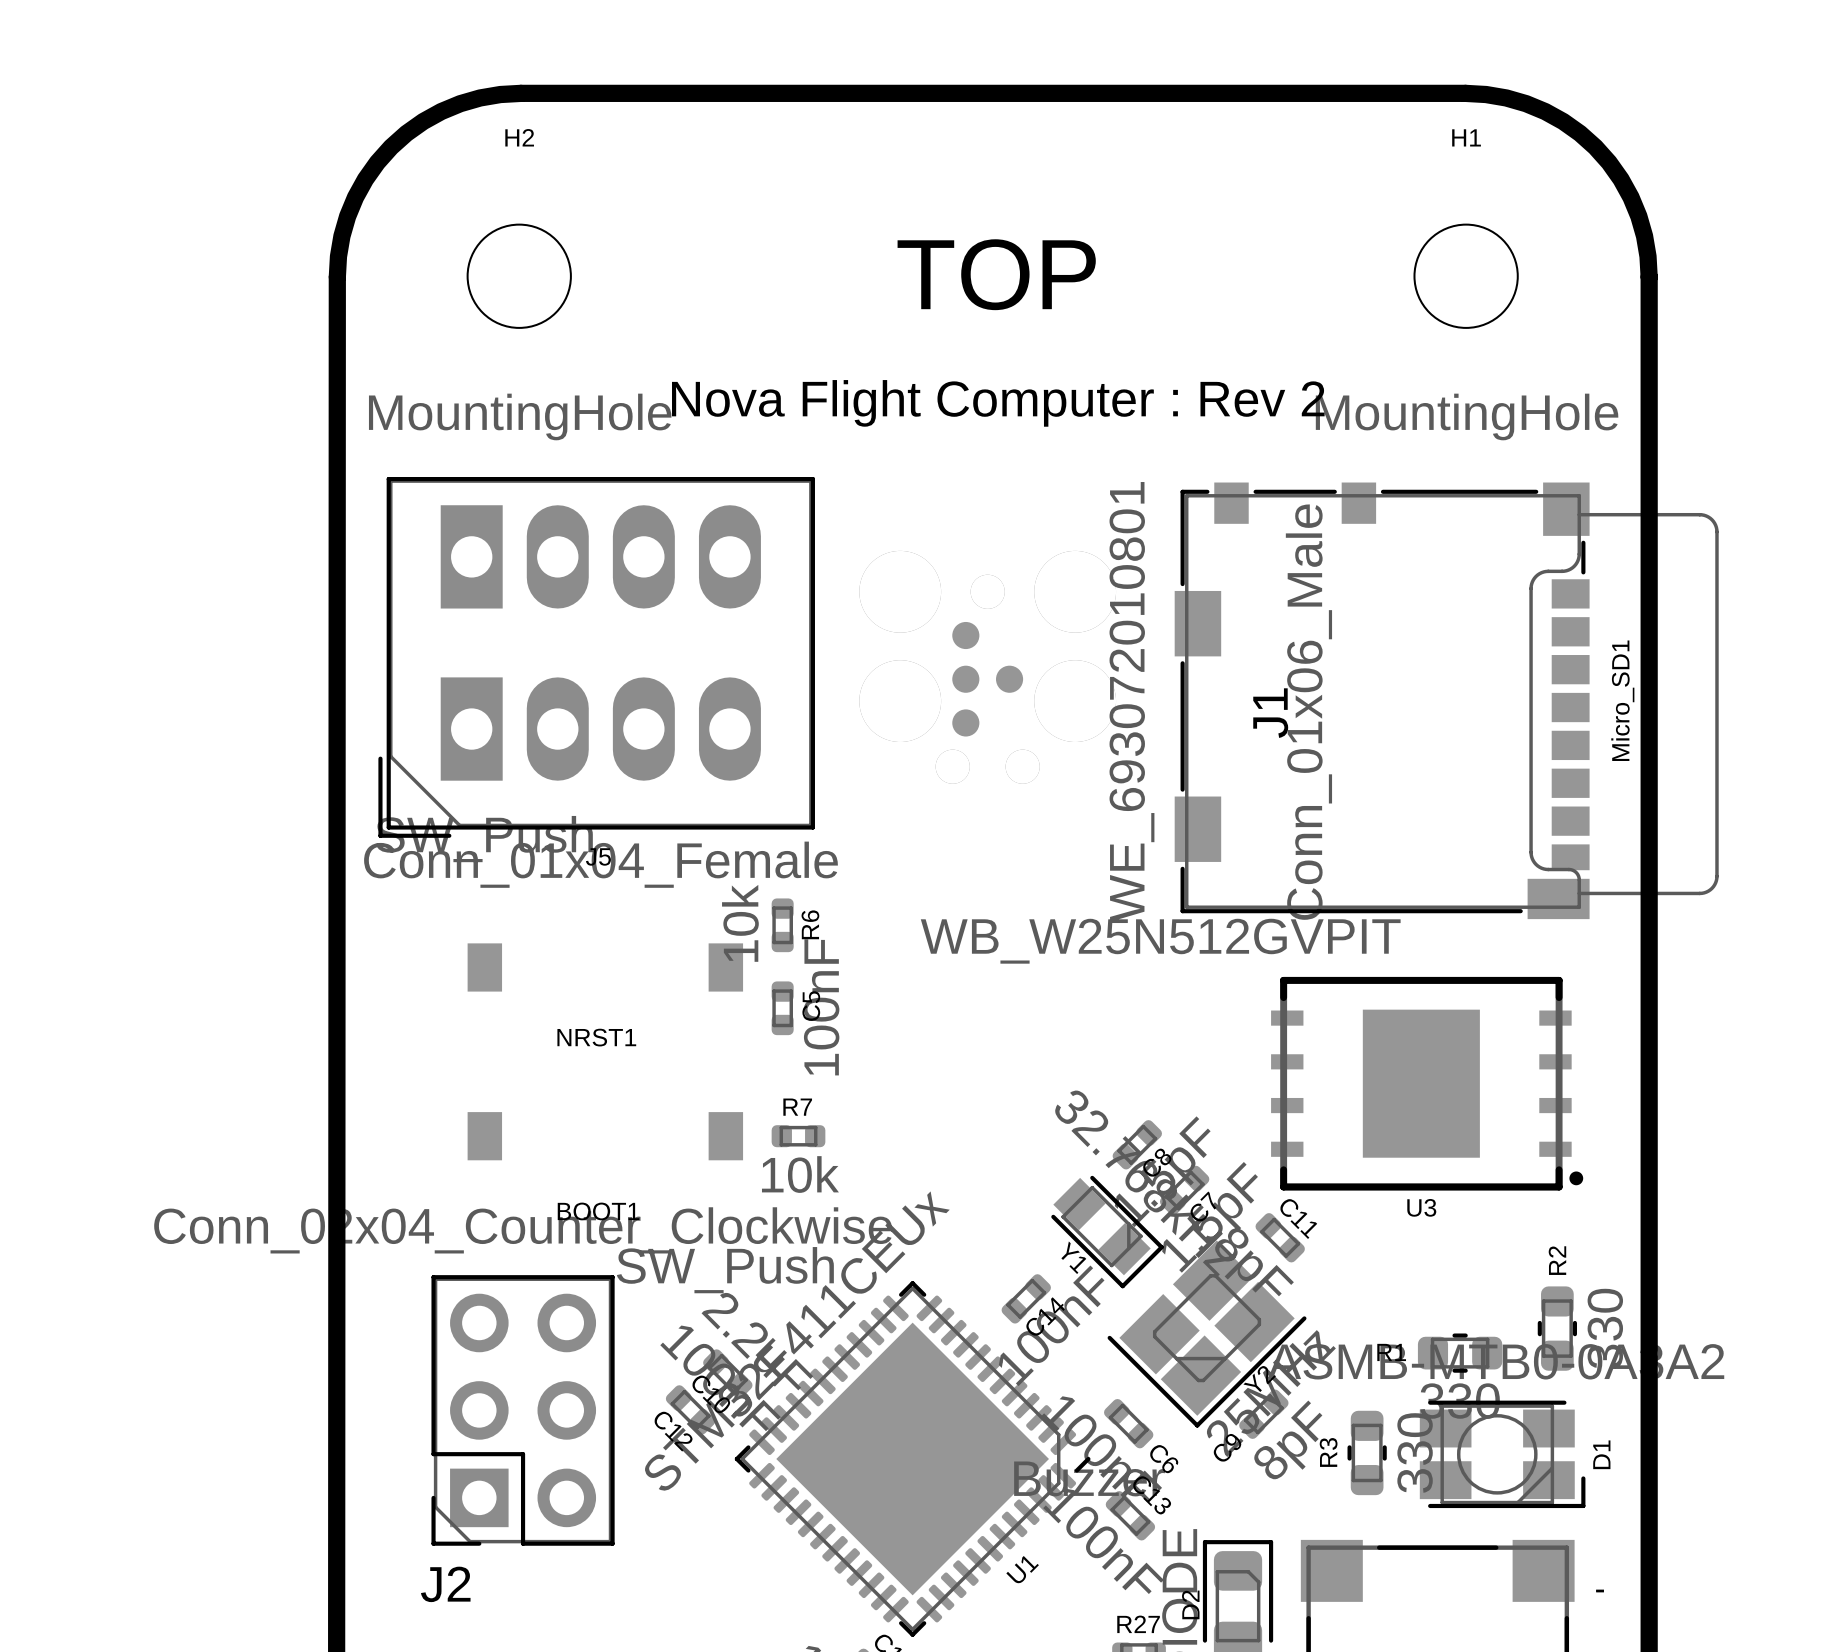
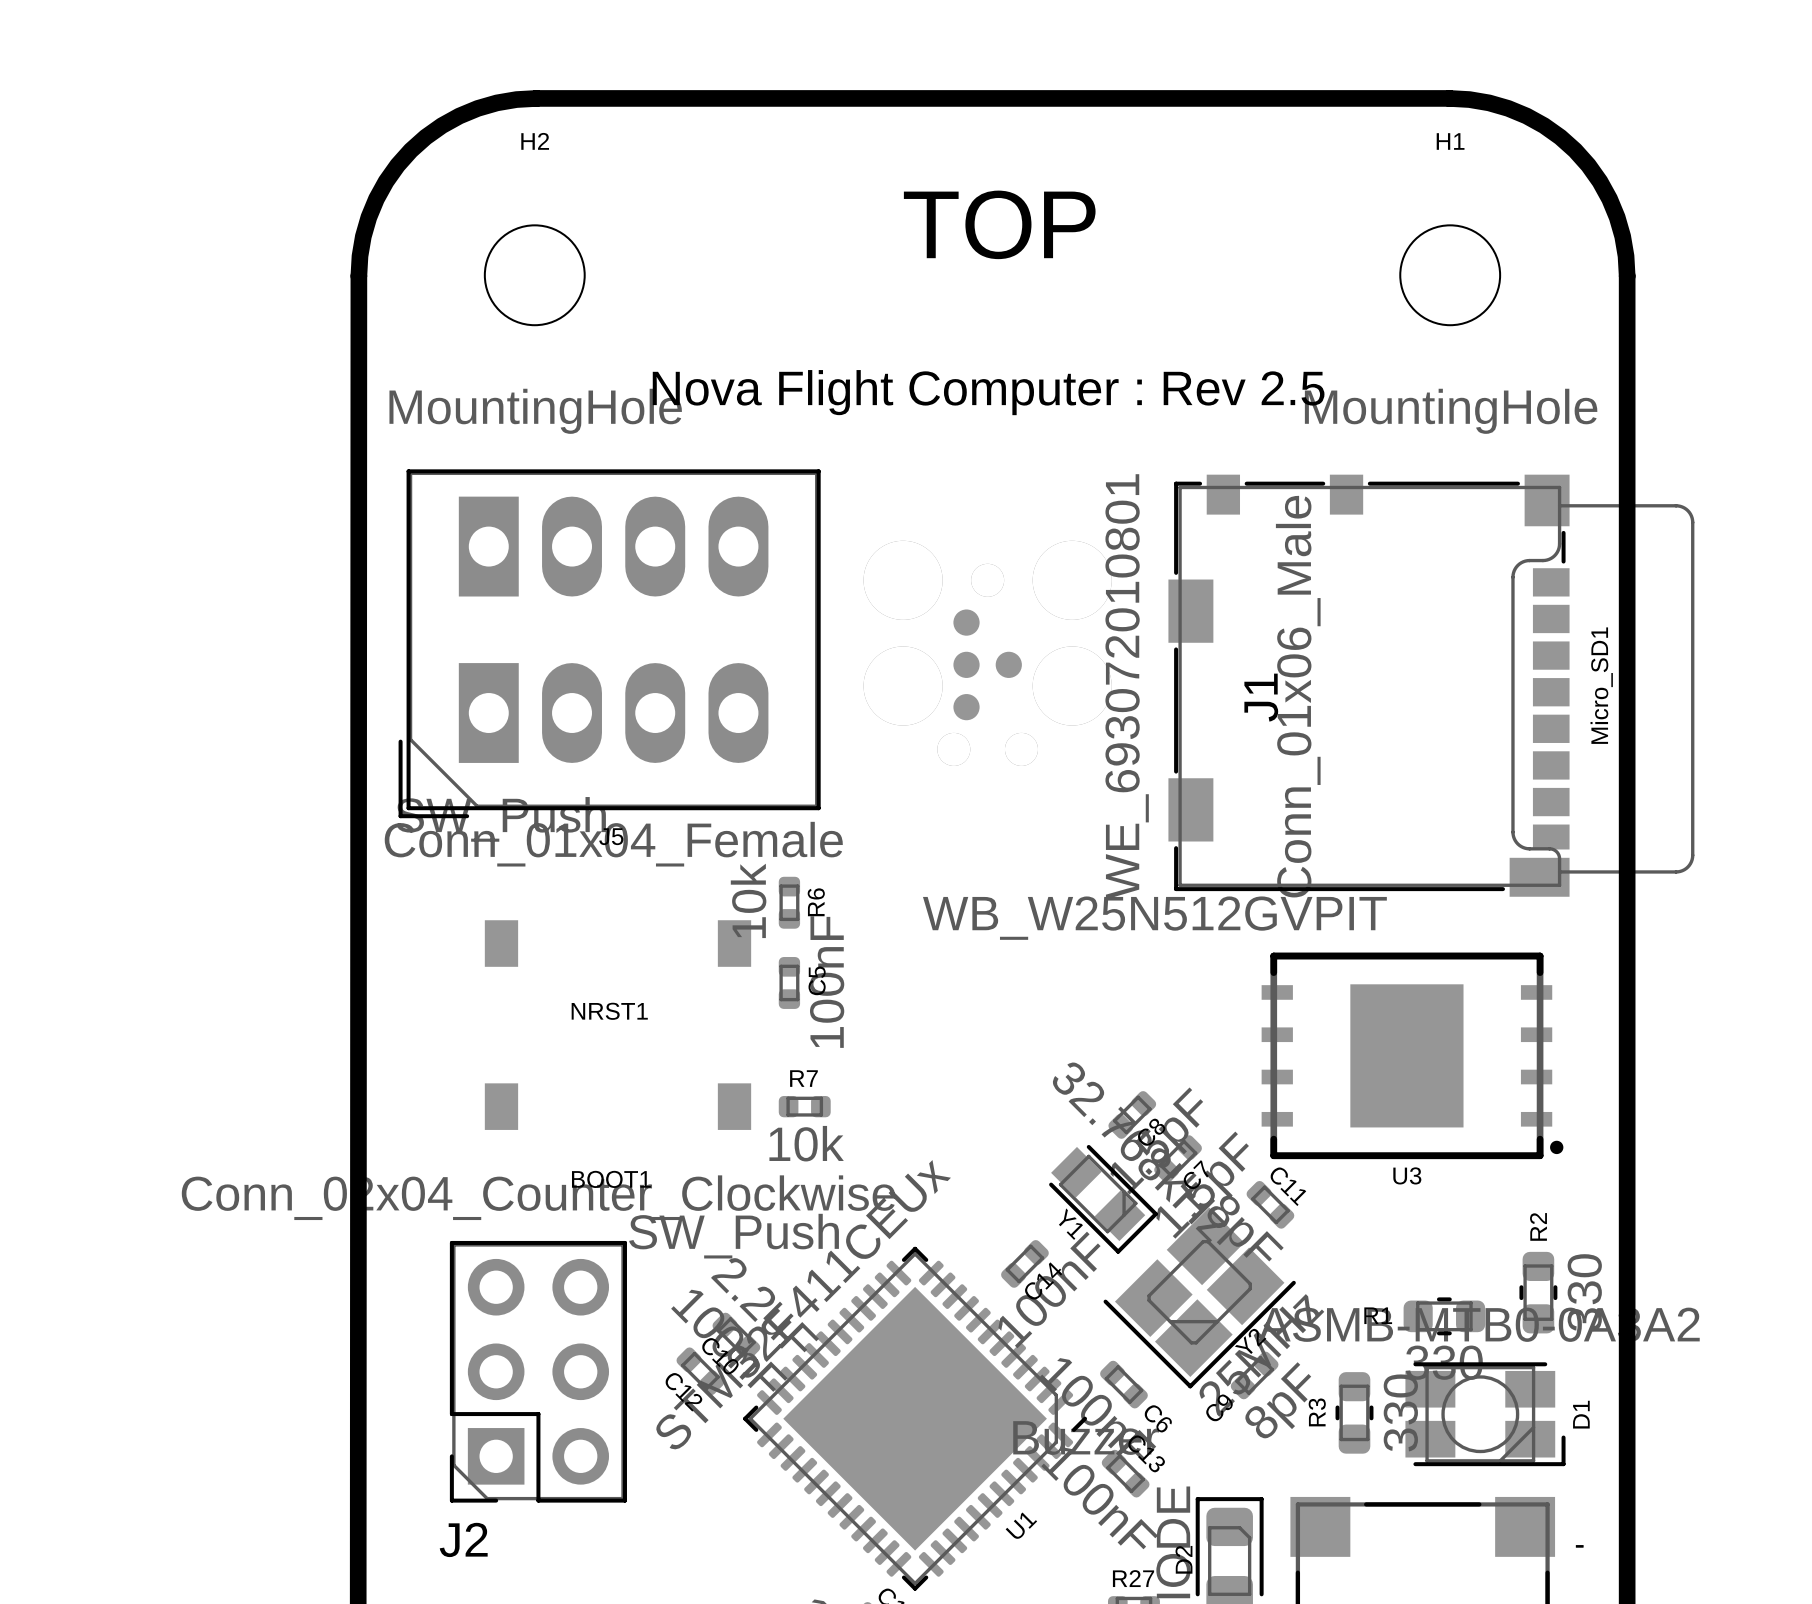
text position: TOP (996, 274) -> TOP (999, 224)
text: Nova Flight Computer : Rev 2 (998, 403) -> Nova Flight Computer : Rev 2.5 (988, 392)

